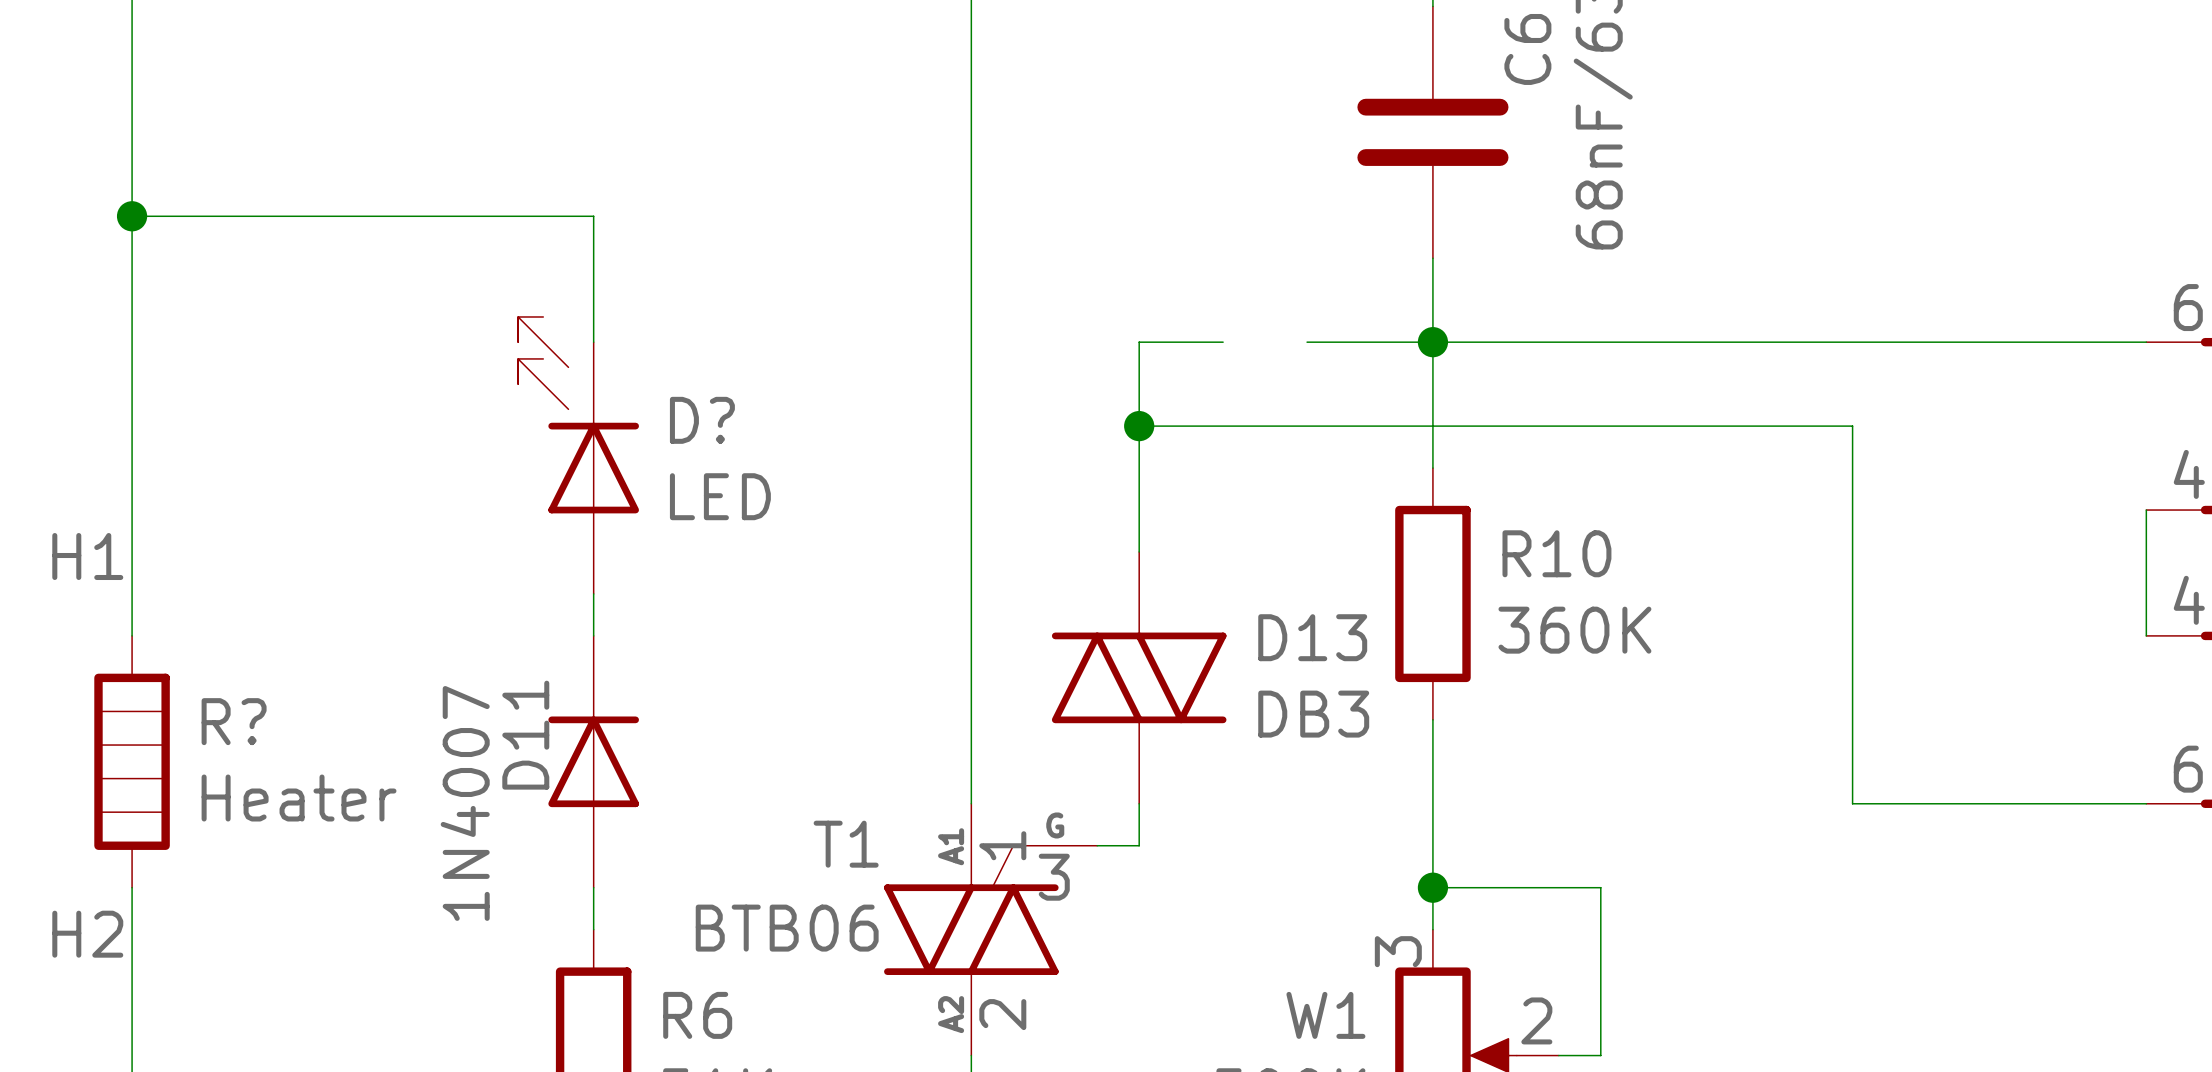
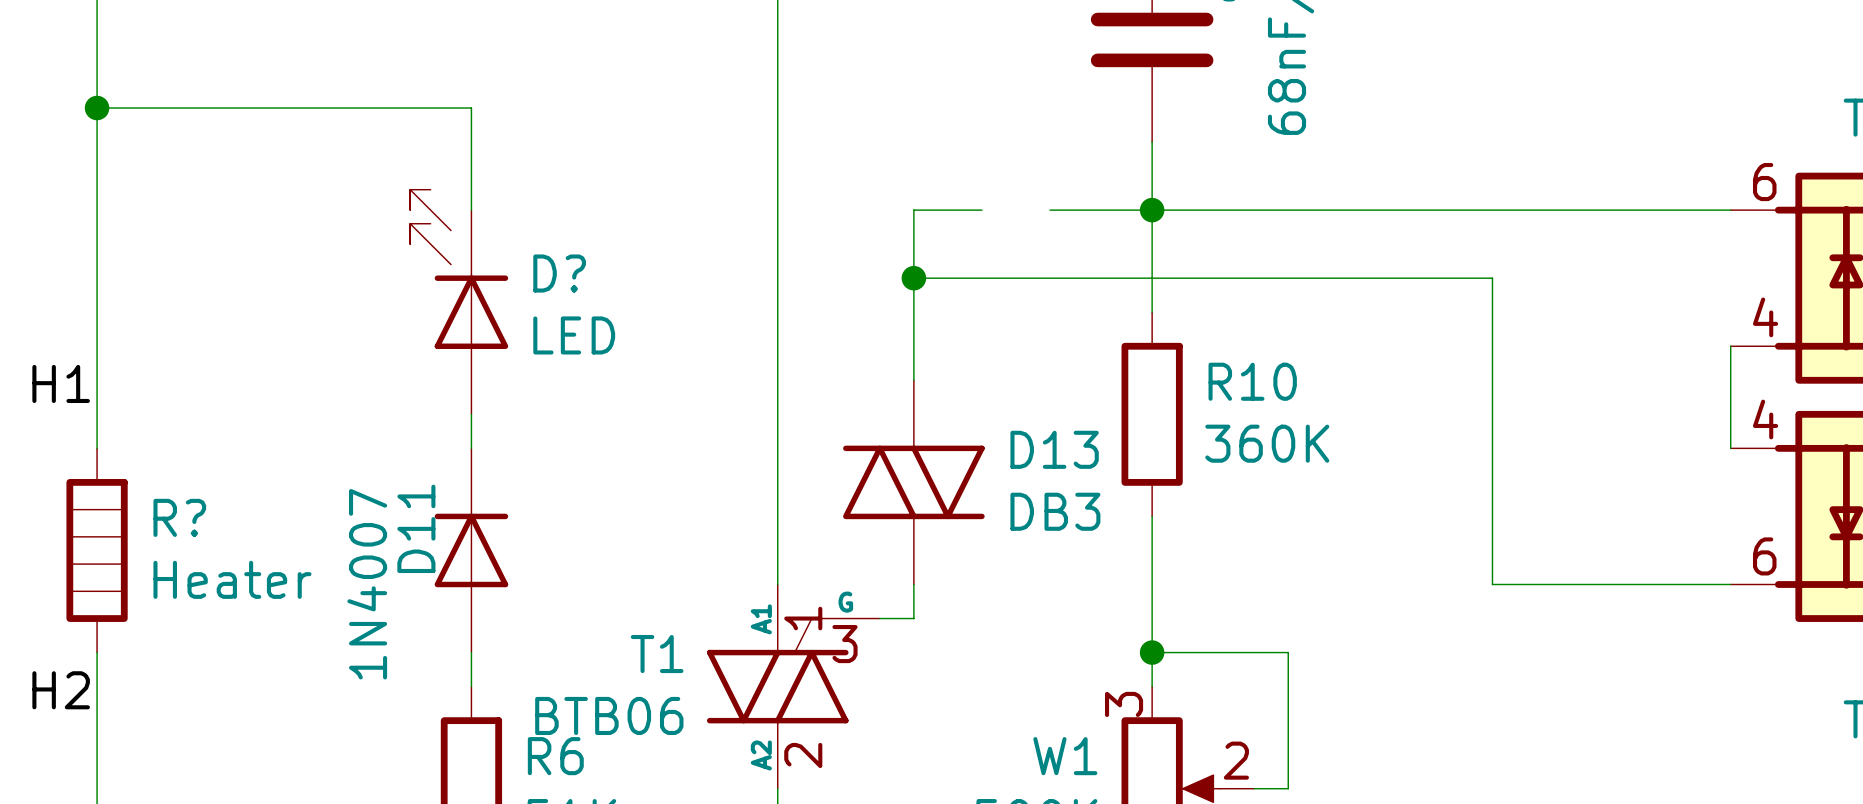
T1 name position: T1 (846, 844) -> T1 (657, 654)
T1 value position: BTB06 (787, 928) -> BTB06 (609, 715)

